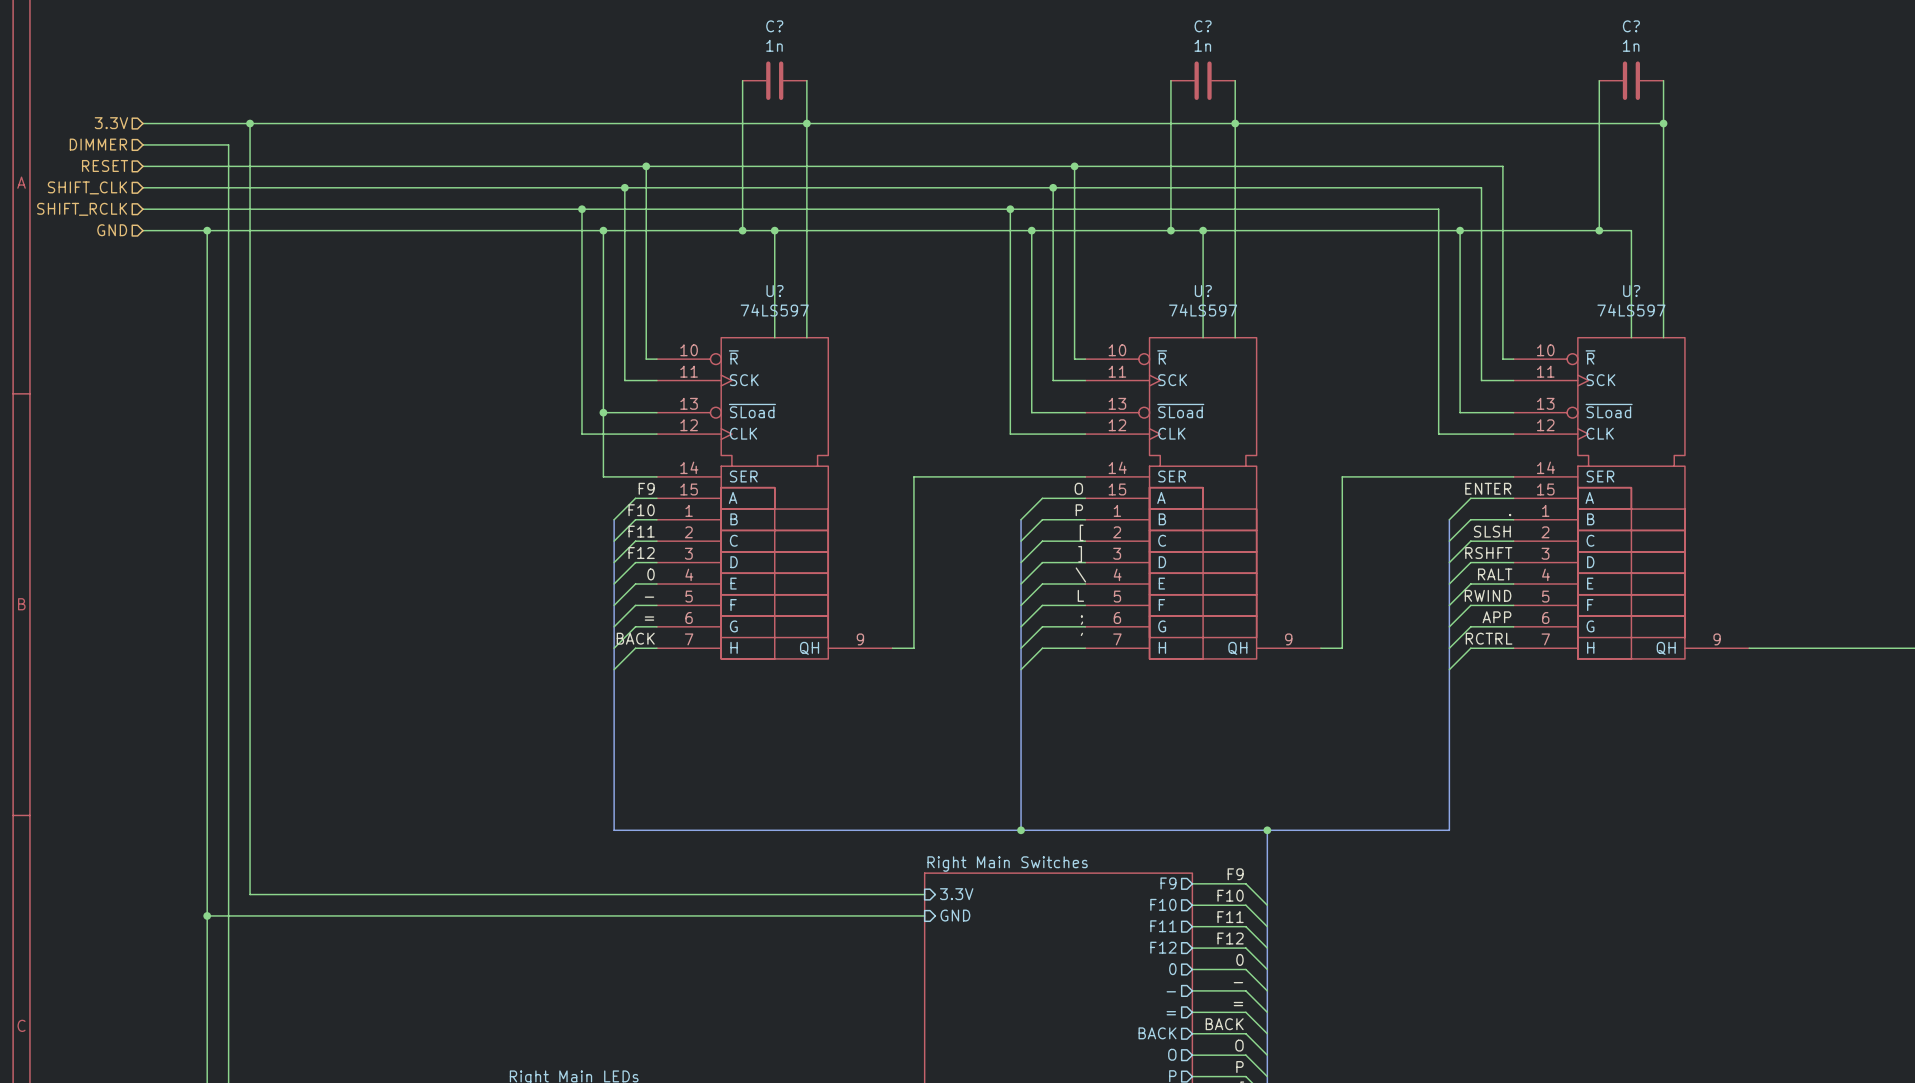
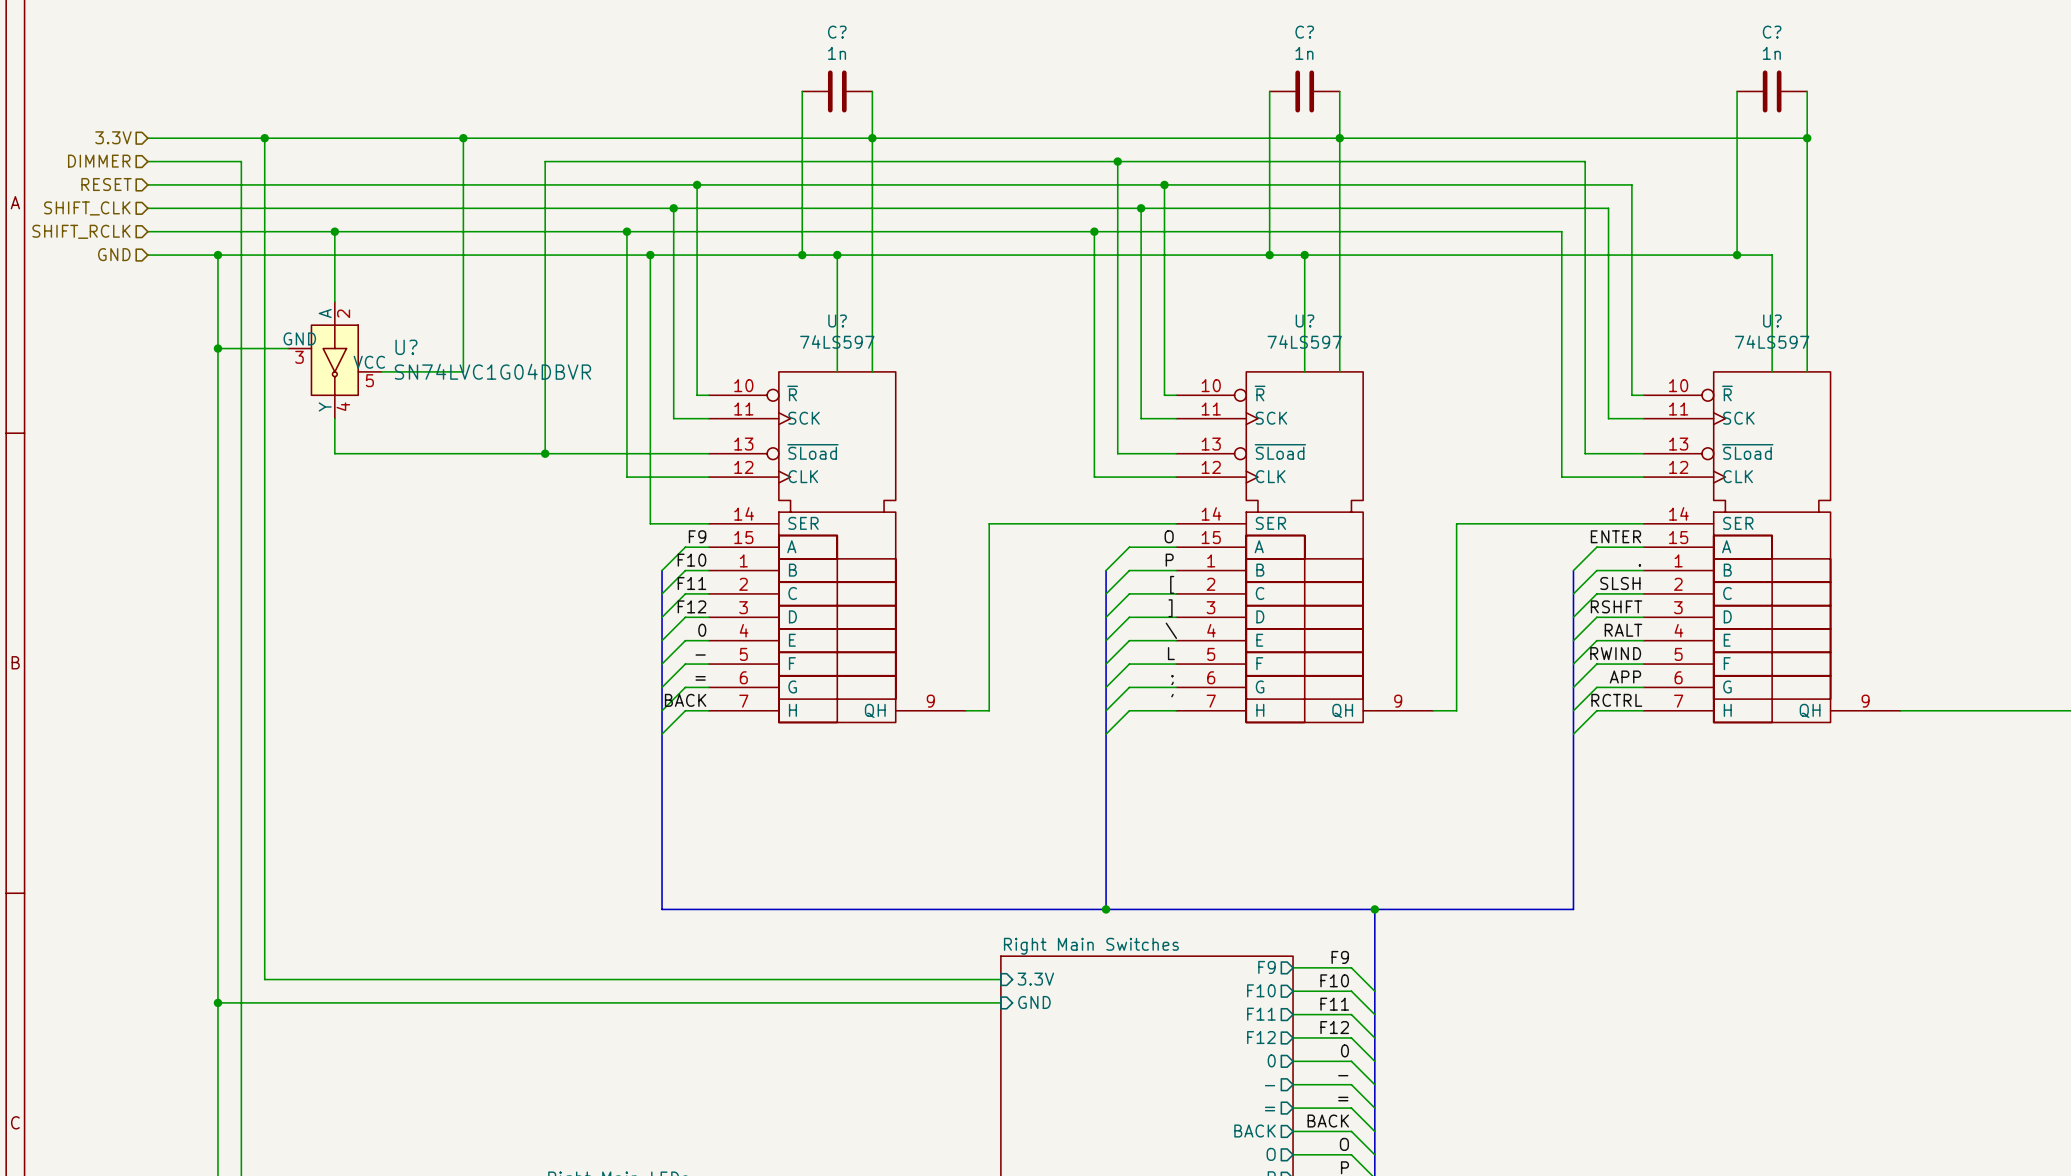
wire: none -> (463, 138) (463, 371) (381, 371)
junction: none -> (463, 138)
wire: none -> (1117, 161) (1117, 255)
junction: none -> (1117, 161)
wire: none -> (334, 231) (334, 301)
junction: none -> (334, 231)
junction: (1031, 230) -> none
wire: none -> (1585, 255) (1585, 161) (545, 161) (545, 453)
junction: (1460, 230) -> none
wire: none -> (217, 348) (288, 348)
junction: none -> (217, 348)
U?: none -> SN74LVC1G04DBVR (334, 360)
wire: none -> (334, 418) (334, 453) (650, 453)
junction: none -> (545, 453)
junction: (603, 412) -> none

